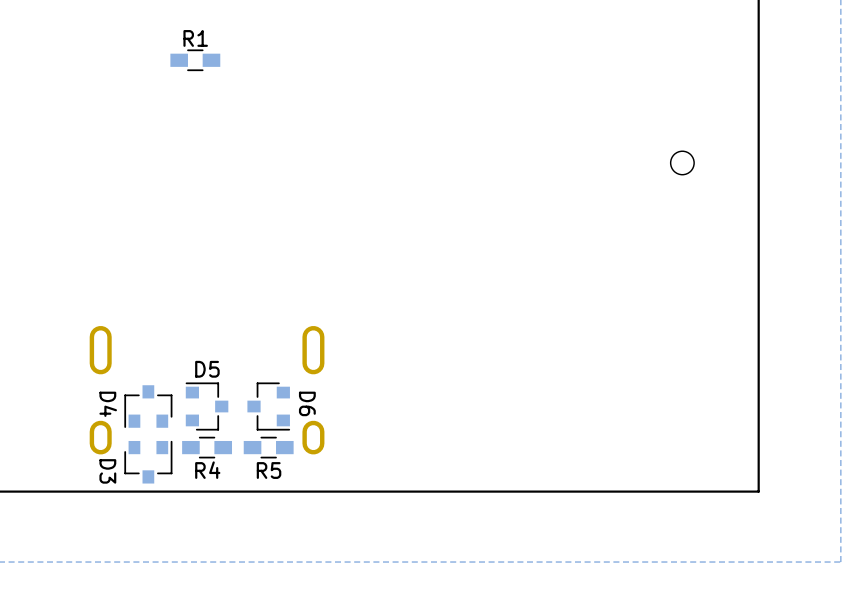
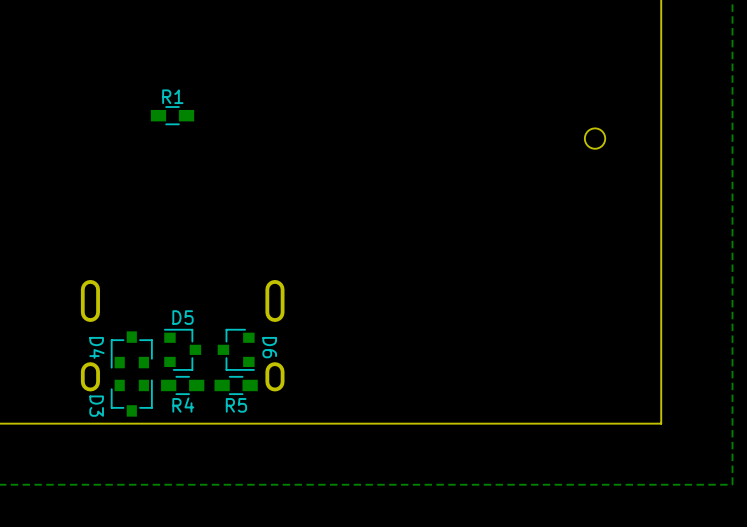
R1 position: (195, 60) -> (172, 115)

